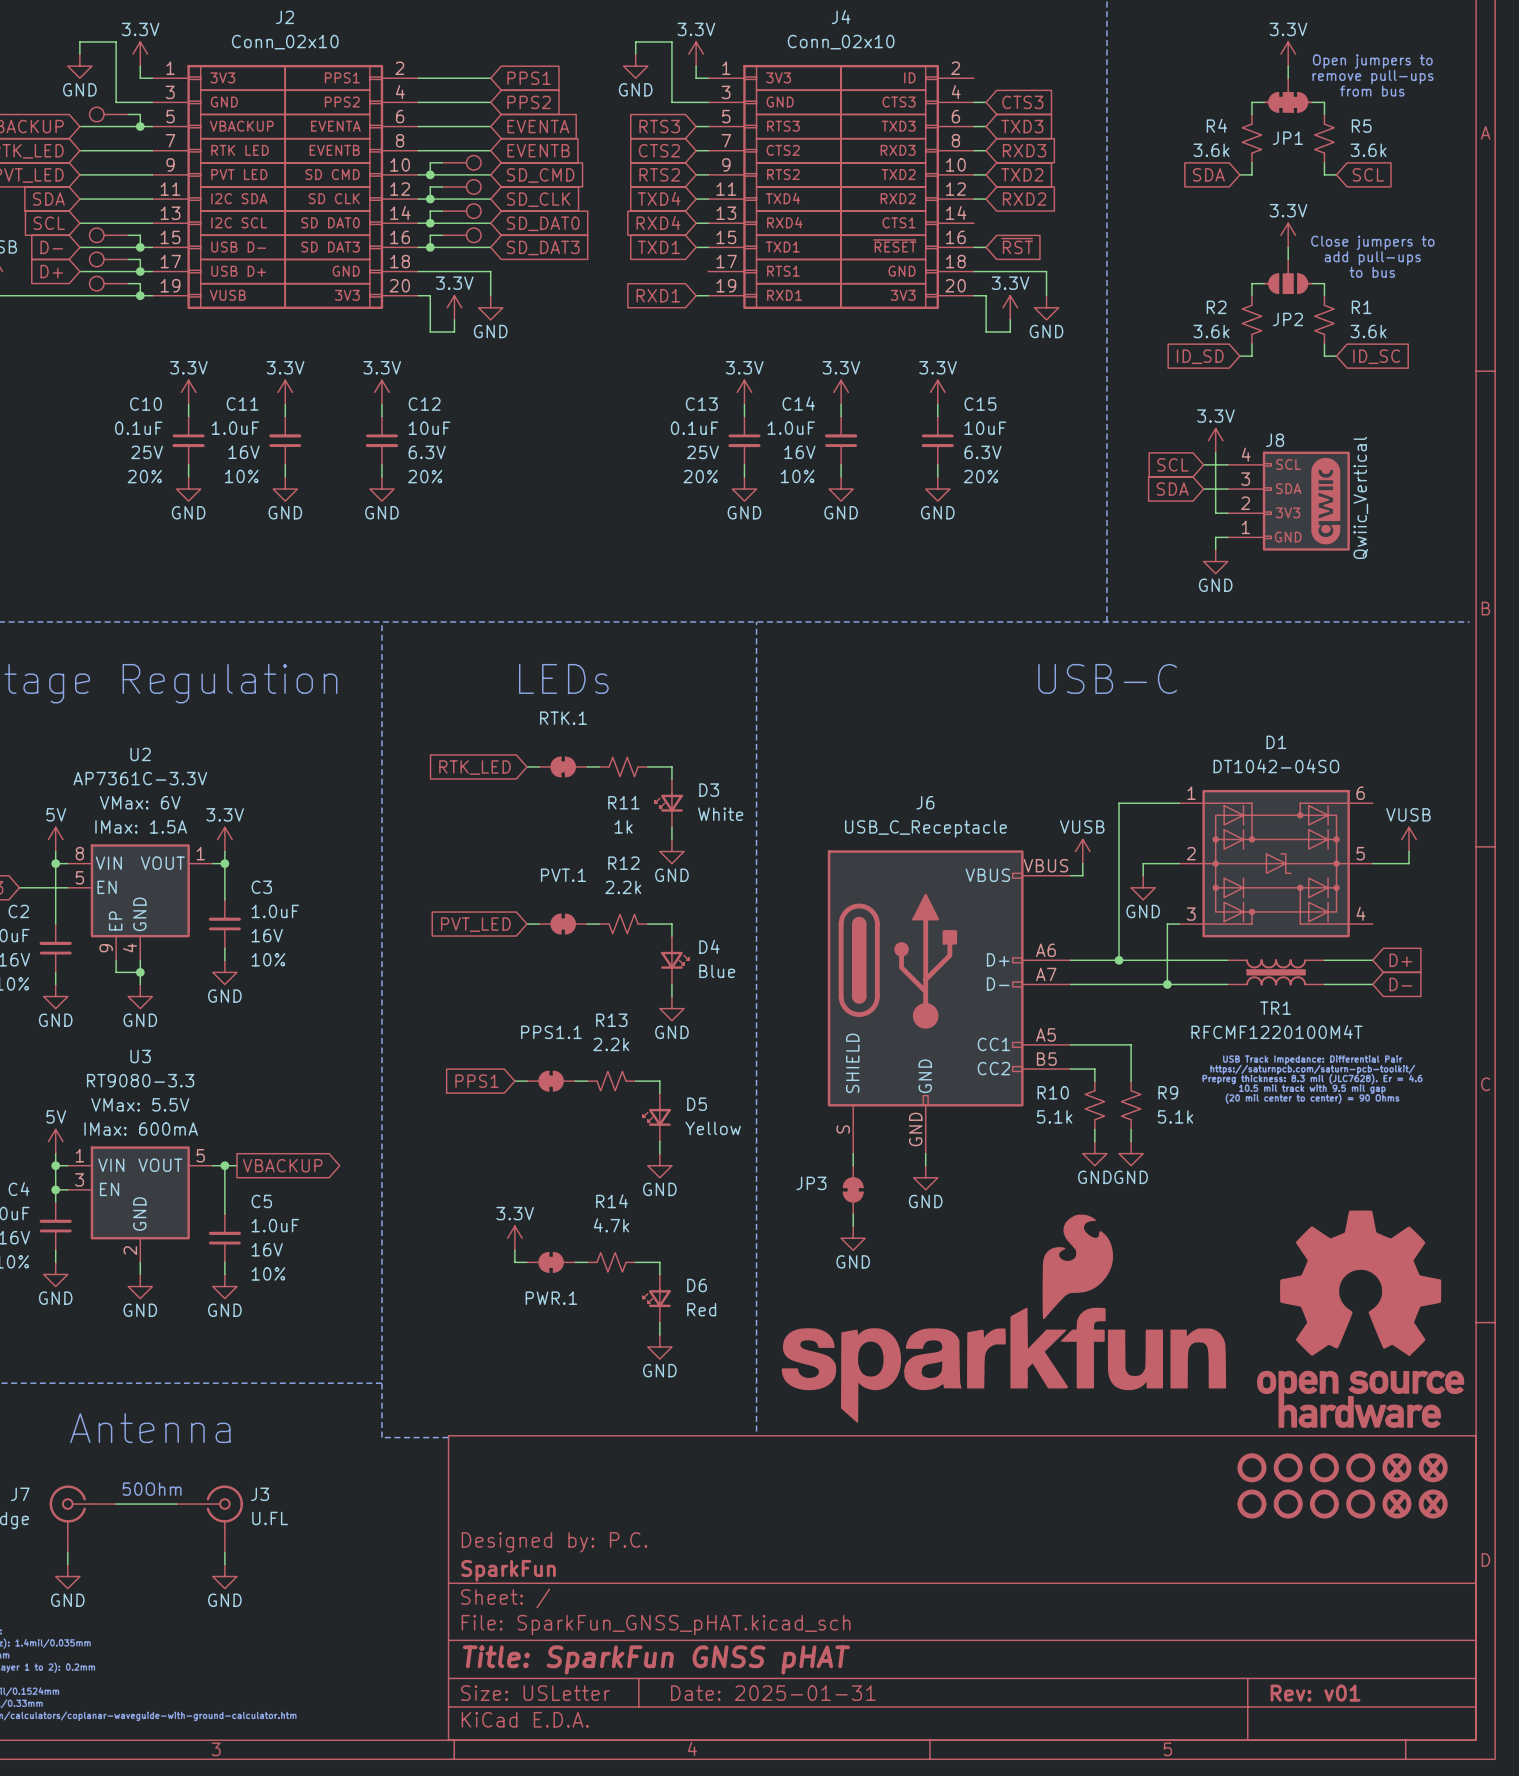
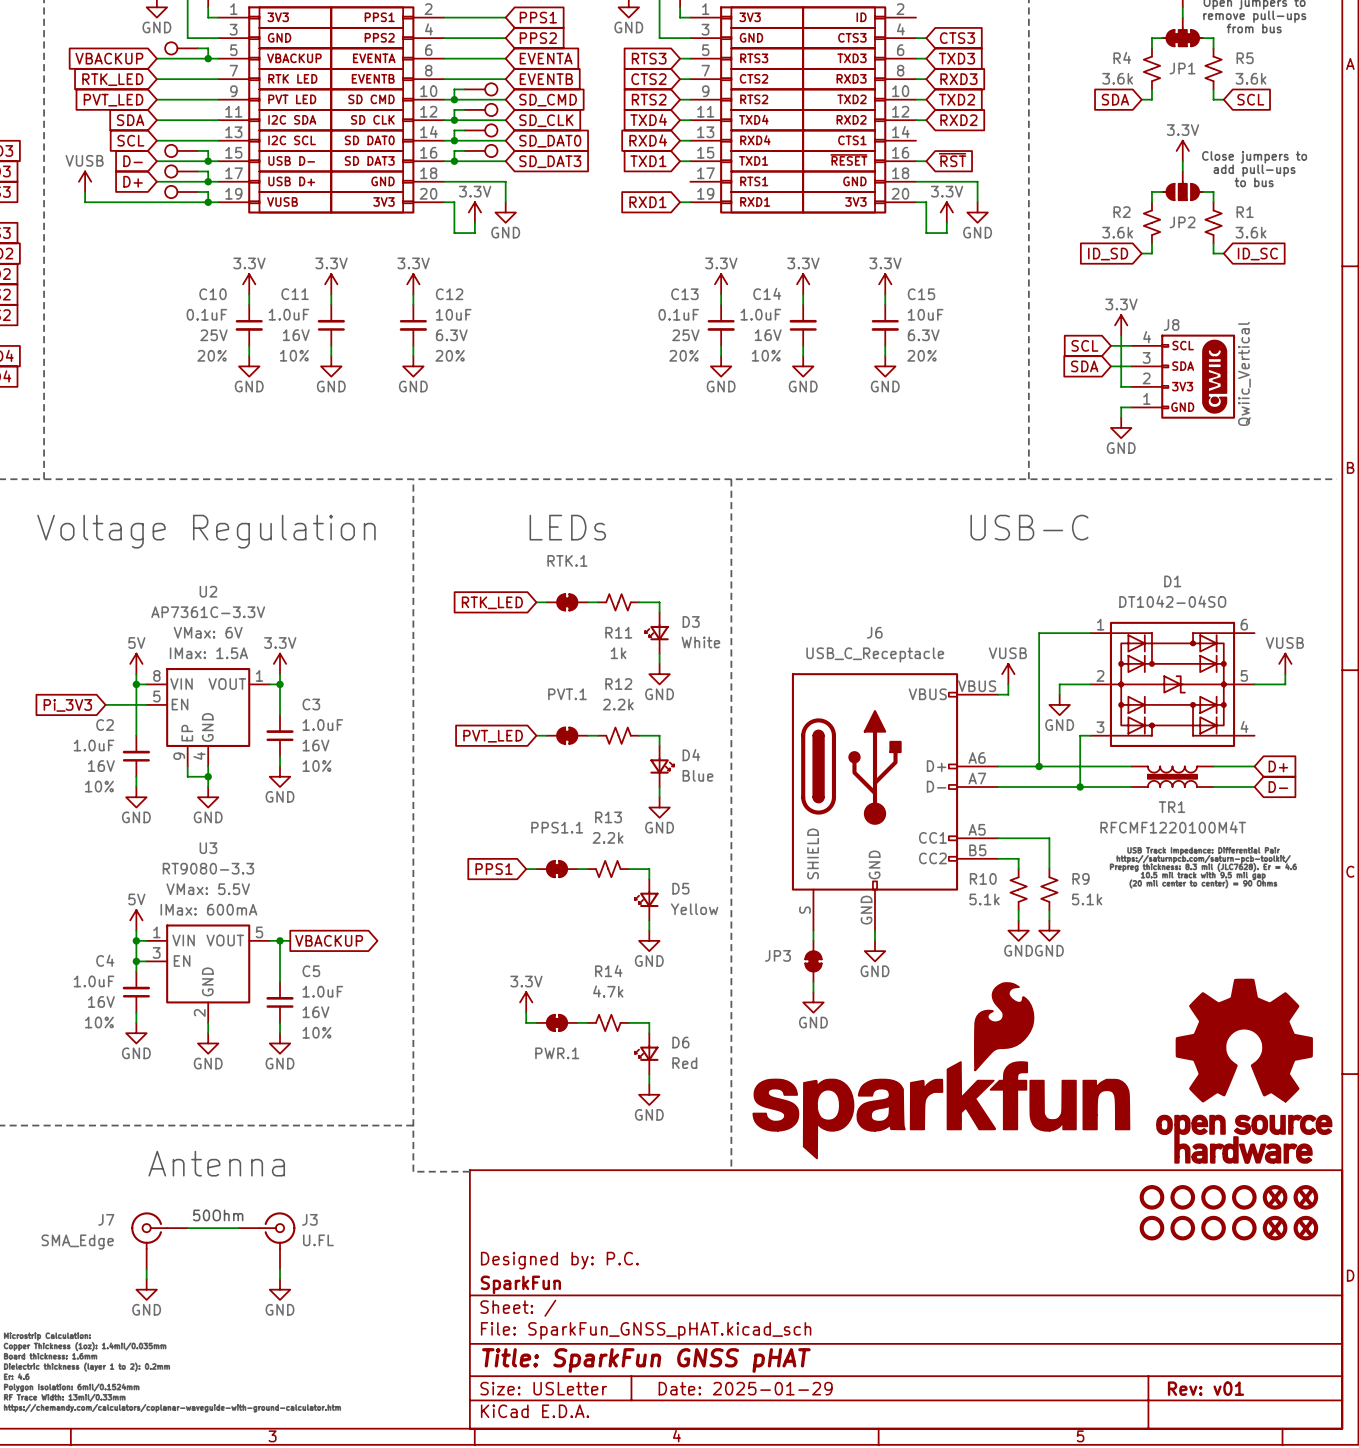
title block: Date: 2025-01-31 (773, 1693) -> Date: 2025-01-29 (745, 1388)

